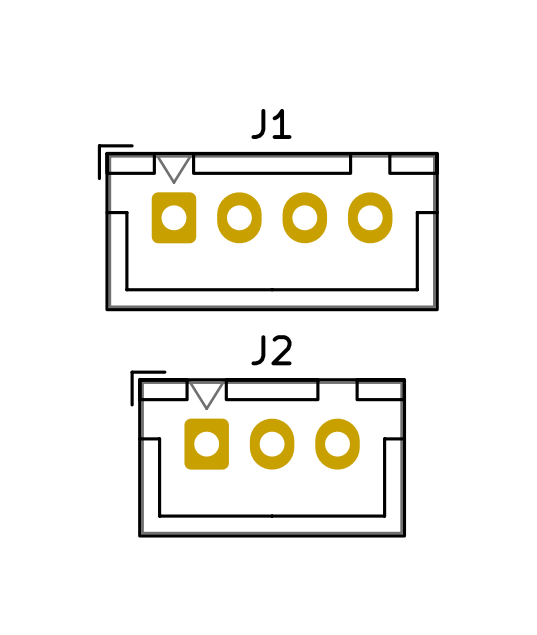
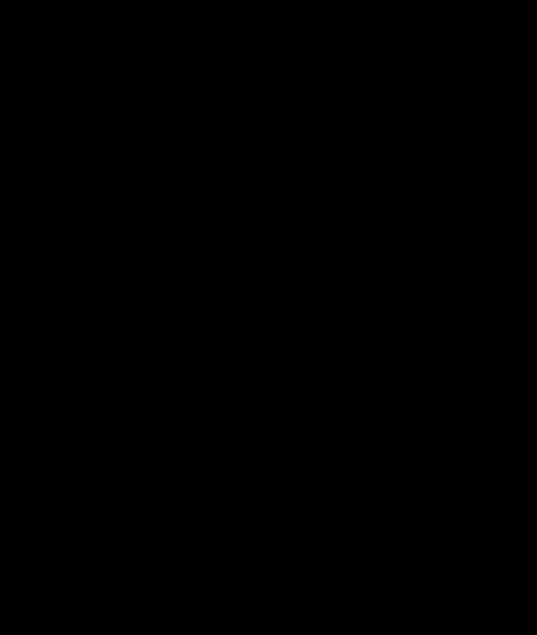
J1: (268, 227) -> none
J2: (268, 454) -> none

